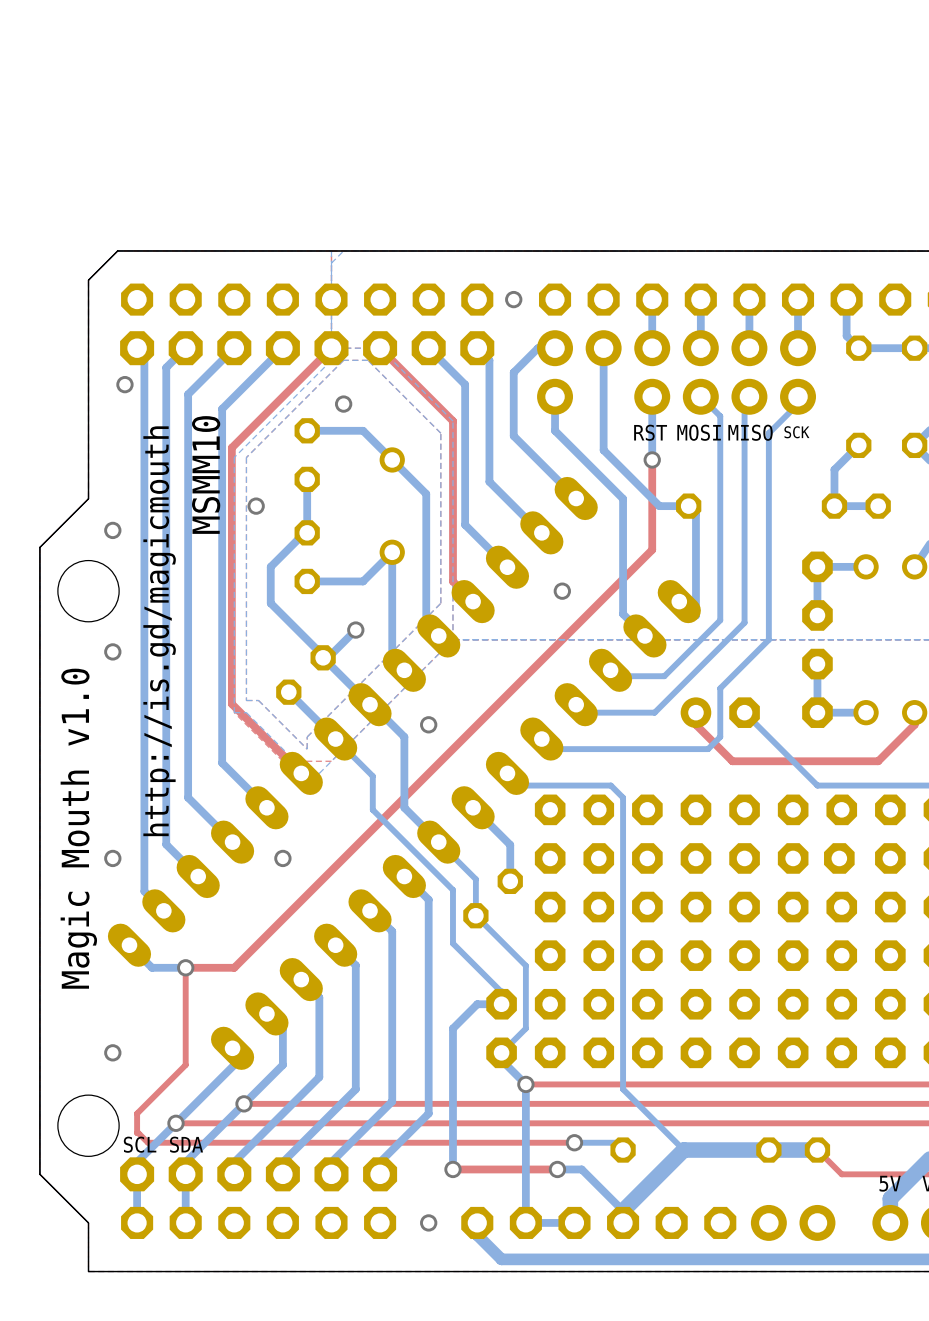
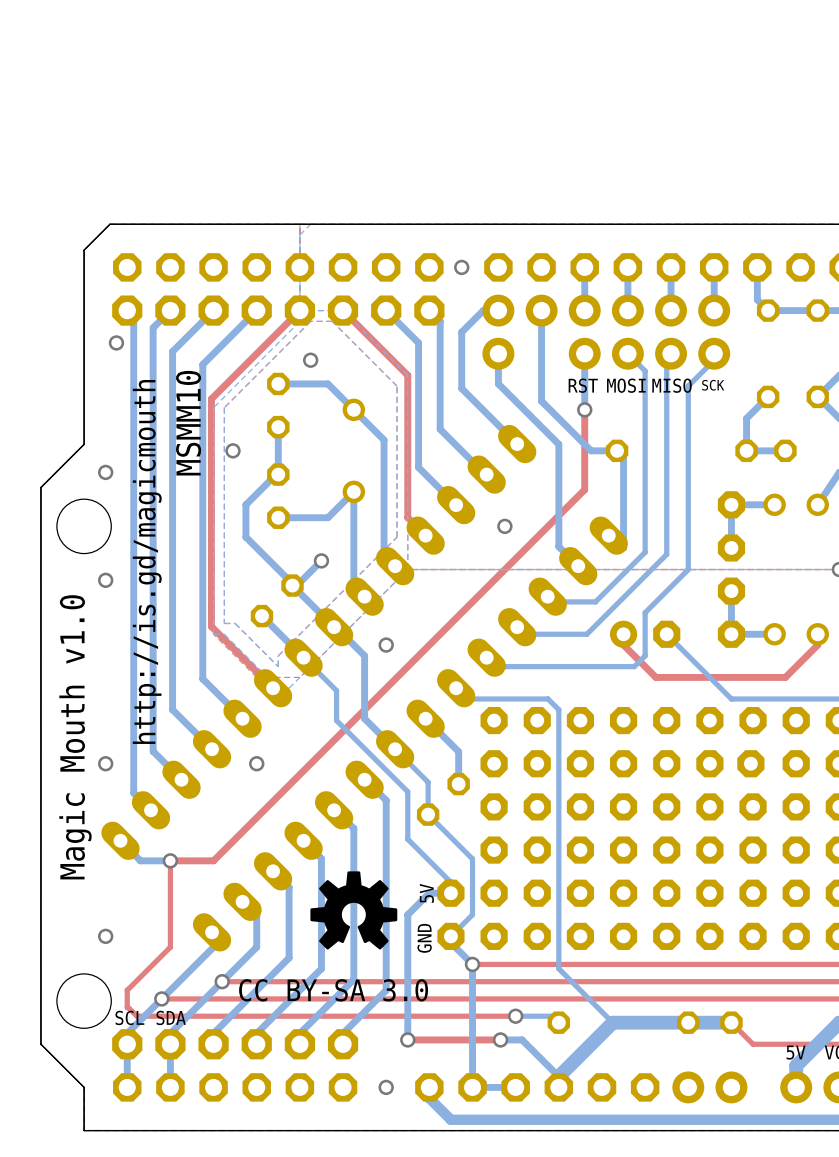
drawing: none -> [310, 871, 398, 950]
text: none -> 5V (426, 893)
text: none -> GND (424, 938)
text: none -> CC BY-SA 3.0 (333, 990)

